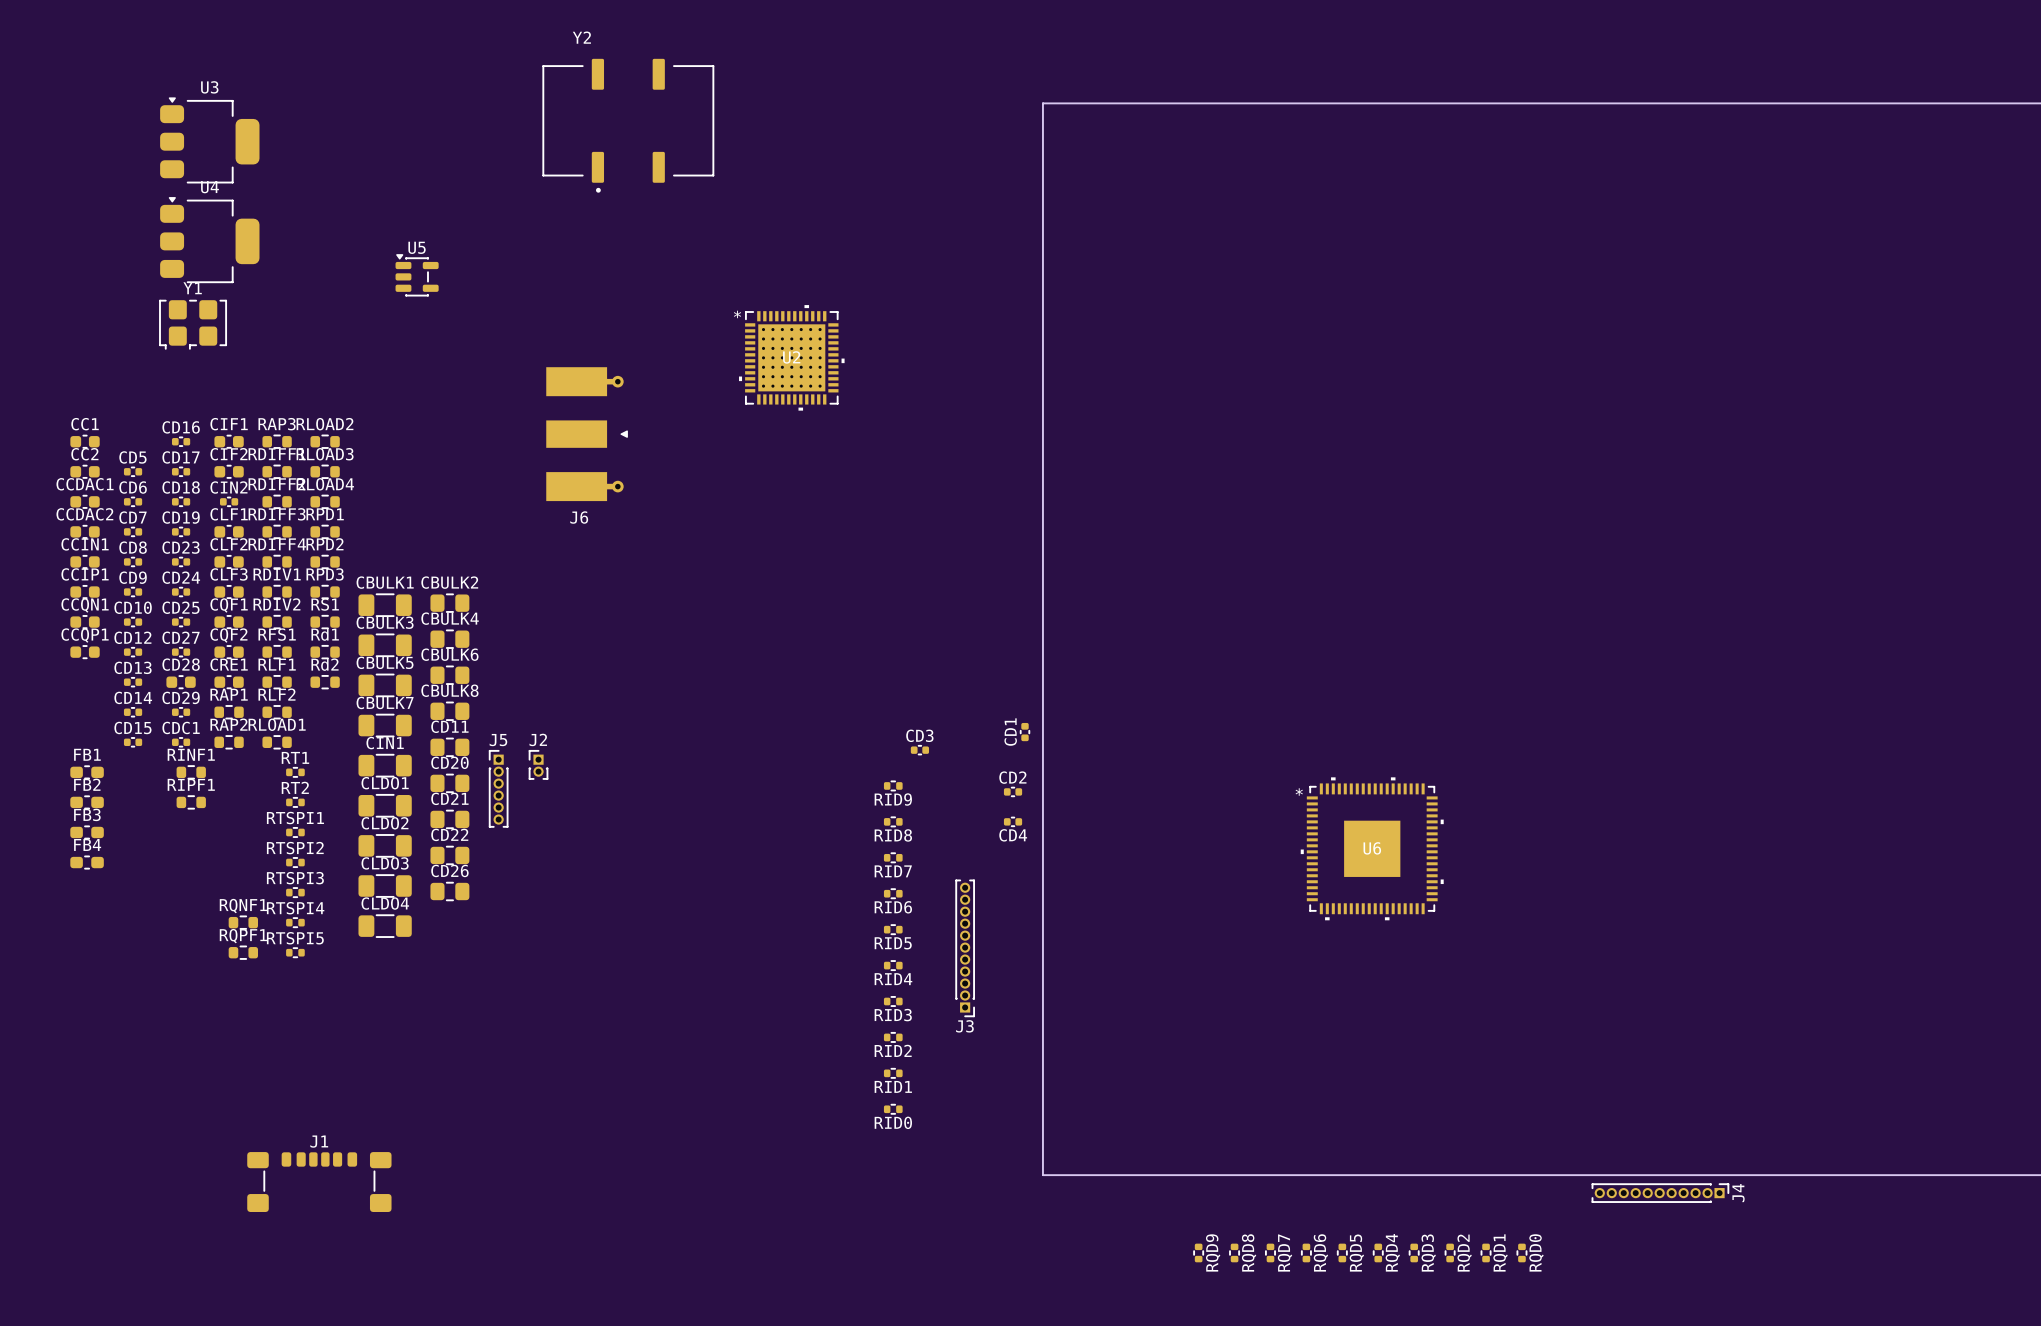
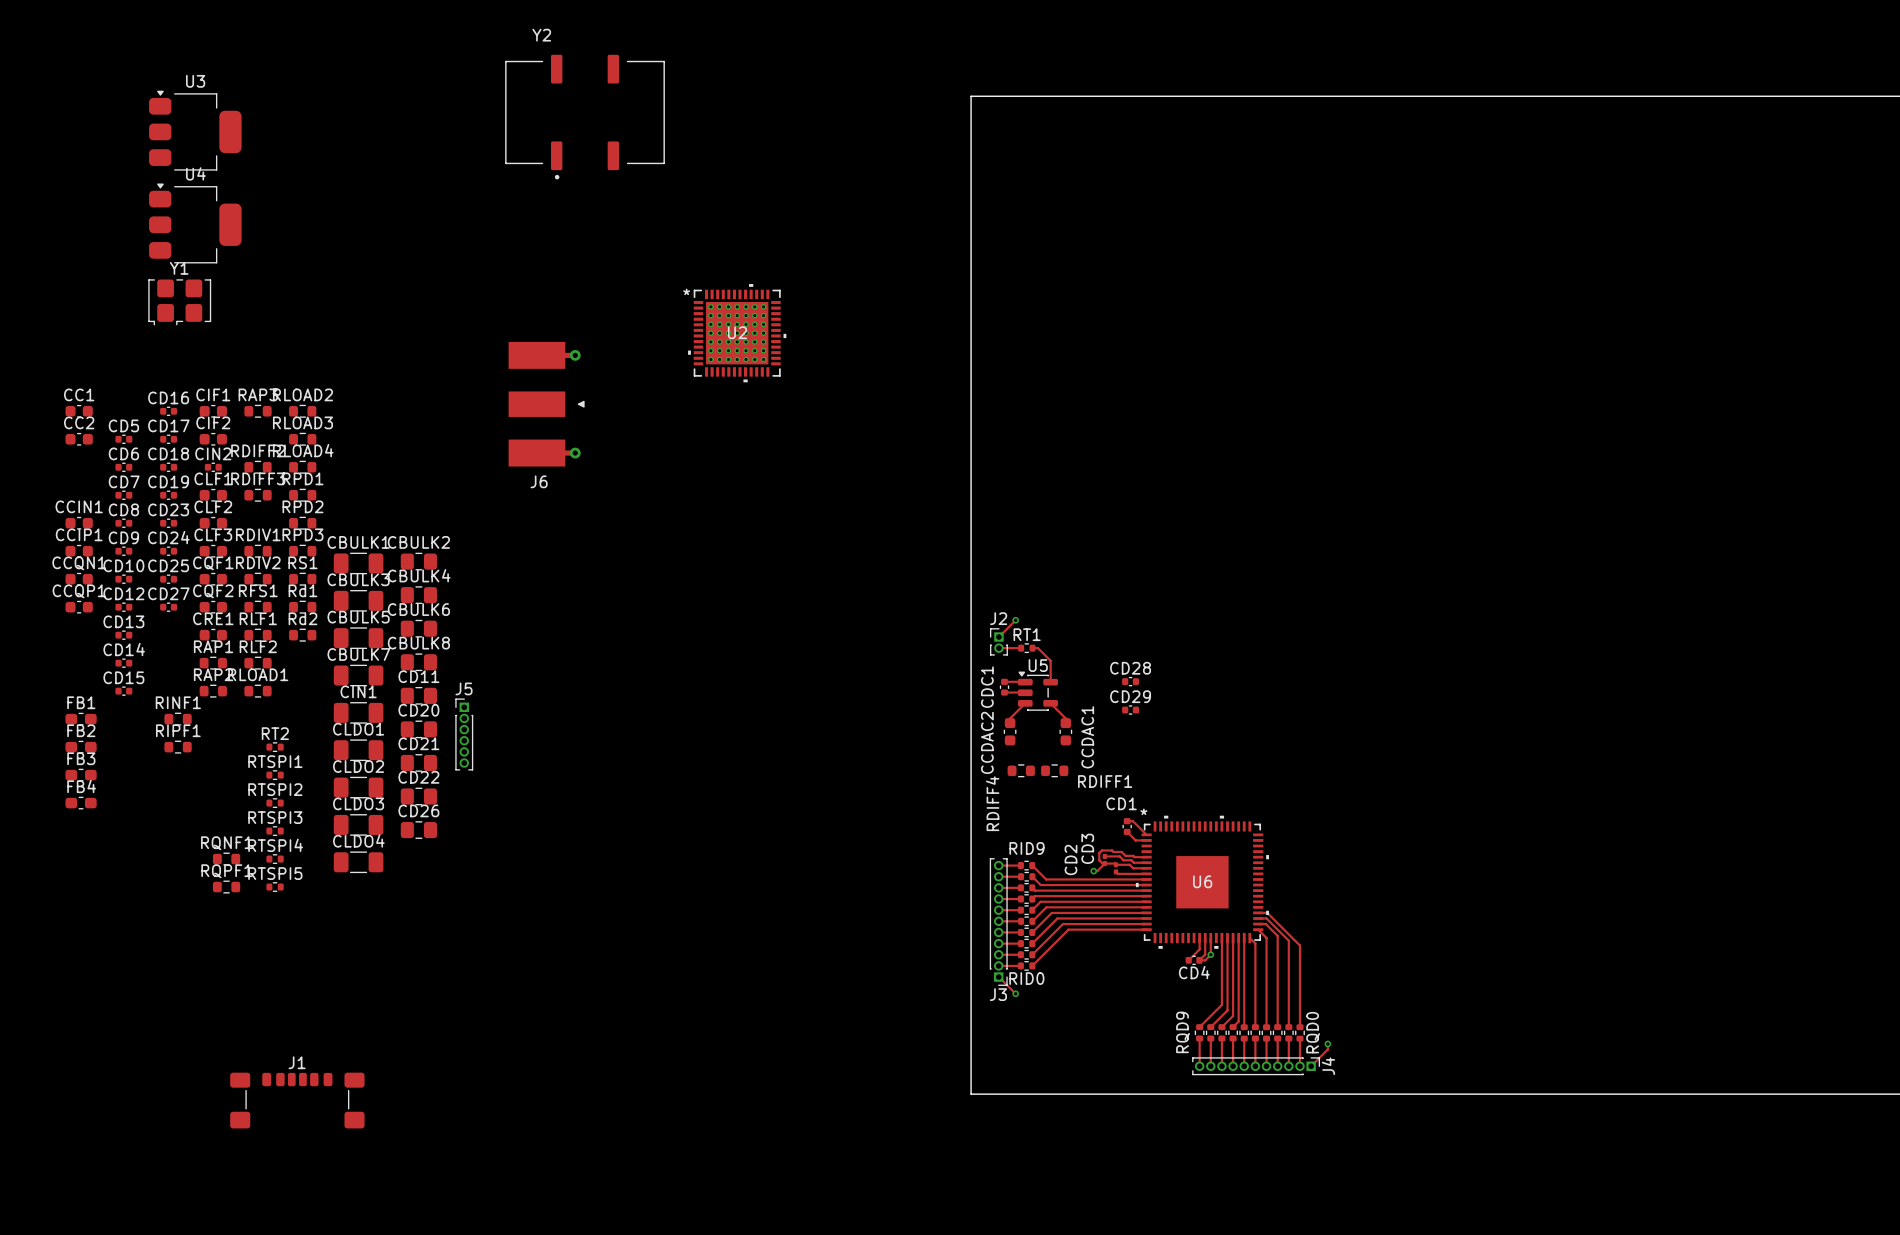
U5 position: (417, 275) -> (1037, 691)
RDIFF1 name position: RDIFF1 (277, 454) -> RDIFF1 (1105, 781)
RDIFF1 position: (277, 471) -> (1054, 770)
CCDAC1 rotation: 0° (85, 501) -> 90° clockwise (1065, 731)
CCDAC1 position: (85, 501) -> (1065, 731)
CCDAC2 name position: CCDAC2 (84, 514) -> CCDAC2 (987, 742)
CCDAC2 rotation: 0° (85, 531) -> 90° clockwise (1010, 731)
CCDAC2 position: (85, 531) -> (1010, 731)
RDIFF4 name rotation: 0° (277, 544) -> 90° counterclockwise (992, 803)
RDIFF4 position: (277, 561) -> (1021, 770)
track: none -> (1015, 620) (998, 637)
via: none -> (1015, 620)
CD28 footprint: [166, 675, 196, 690] -> [1122, 676, 1140, 687]
track: none -> (998, 648) (1021, 648)
track: none -> (1032, 648) (1037, 648) (1050, 660) (1050, 682)
CD29 position: (181, 712) -> (1130, 710)
CD1 name rotation: 0° (1010, 732) -> 90° clockwise (1121, 803)
CD1 position: (1025, 732) -> (1127, 826)
track: none -> (1004, 681) (1025, 682)
CD3 name position: CD3 (919, 735) -> CD3 (1087, 848)
CDC1 rotation: 0° (181, 742) -> 90° clockwise (1004, 687)
CDC1 position: (181, 742) -> (1004, 687)
track: none -> (1004, 692) (1025, 692)
CD3 footprint: [910, 745, 930, 756] -> [1113, 862, 1119, 875]
track: none -> (1025, 703) (1010, 718) (1010, 723)
track: none -> (1050, 703) (1065, 718) (1065, 723)
J2 position: (538, 764) -> (998, 641)
RT1 position: (295, 772) -> (1026, 648)
CD2 name position: CD2 (1012, 777) -> CD2 (1071, 859)
RID9 position: (893, 785) -> (1026, 865)
CD2 footprint: [1003, 786, 1023, 797] -> [1102, 853, 1108, 867]
U6 text position: * (1299, 792) -> * (1143, 811)
RID9 name position: RID9 (893, 799) -> RID9 (1026, 848)
RID8: (893, 821) -> none
CD4 position: (1013, 821) -> (1194, 960)
U6 position: (1372, 848) -> (1202, 882)
RID7: (893, 857) -> none
track: none -> (1127, 821) (1132, 821) (1146, 834)
RID6: (893, 893) -> none
track: none -> (1127, 831) (1135, 840) (1146, 840)
track: none -> (1104, 856) (1119, 856) (1123, 860) (1131, 860) (1133, 862) (1146, 862)
track: none -> (1146, 857) (1125, 855) (1121, 851) (1112, 850) (1101, 850) (1099, 853) (1099, 860) (1102, 863) (1129, 864) (1133, 868) (1146, 868)
track: none -> (1104, 863) (1097, 871) (1093, 871)
RID5: (893, 929) -> none
track: none -> (998, 865) (1020, 865)
track: none -> (1032, 865) (1046, 879) (1146, 879)
via: none -> (1093, 871)
track: none -> (1116, 871) (1117, 873) (1146, 873)
track: none -> (998, 876) (1021, 876)
part: none -> (1026, 876)
track: none -> (1032, 876) (1040, 885) (1146, 885)
J3 position: (965, 948) -> (998, 922)
track: none -> (998, 887) (1020, 887)
part: none -> (1026, 887)
track: none -> (1032, 887) (1035, 890) (1146, 890)
track: none -> (1146, 896) (1035, 896) (1032, 899)
RID4: (893, 965) -> none
track: none -> (998, 899) (1020, 899)
part: none -> (1026, 899)
track: none -> (1146, 901) (1040, 901) (1032, 910)
track: none -> (1146, 907) (1046, 907) (1032, 921)
track: none -> (998, 910) (1020, 910)
part: none -> (1026, 910)
track: none -> (1146, 912) (1051, 912) (1032, 932)
track: none -> (1258, 912) (1267, 912) (1299, 945) (1299, 1027)
track: none -> (1146, 918) (1057, 918) (1032, 943)
track: none -> (1258, 918) (1266, 918) (1288, 940) (1288, 1027)
track: none -> (998, 921) (1021, 921)
part: none -> (1026, 921)
track: none -> (1146, 924) (1062, 924) (1032, 954)
track: none -> (1258, 924) (1265, 924) (1277, 935) (1277, 1027)
track: none -> (1146, 929) (1068, 929) (1032, 965)
track: none -> (1258, 929) (1266, 937) (1266, 1027)
RID3: (893, 1001) -> none
track: none -> (998, 932) (1020, 932)
part: none -> (1026, 932)
track: none -> (1199, 938) (1199, 949) (1188, 960)
track: none -> (1205, 938) (1205, 954) (1199, 960) (1205, 960) (1210, 954) (1210, 938)
track: none -> (1221, 938) (1221, 1004) (1199, 1027)
track: none -> (1227, 938) (1227, 1010) (1210, 1027)
track: none -> (1233, 938) (1233, 1015) (1221, 1027)
track: none -> (1238, 938) (1238, 1021) (1233, 1027)
track: none -> (1244, 938) (1244, 1027)
track: none -> (1249, 938) (1255, 943) (1255, 1027)
track: none -> (998, 943) (1020, 943)
part: none -> (1026, 943)
track: none -> (998, 954) (1020, 954)
part: none -> (1026, 954)
via: none -> (1210, 954)
RID2: (893, 1037) -> none
track: none -> (998, 965) (1020, 965)
track: none -> (998, 977) (1015, 993)
via: none -> (1015, 993)
RID1: (893, 1073) -> none
RID0 position: (893, 1109) -> (1026, 965)
part: none -> (1210, 1032)
part: none -> (1221, 1032)
part: none -> (1233, 1032)
part: none -> (1244, 1032)
part: none -> (1255, 1032)
part: none -> (1266, 1032)
part: none -> (1277, 1032)
part: none -> (1288, 1032)
track: none -> (1199, 1038) (1199, 1066)
track: none -> (1210, 1038) (1210, 1066)
track: none -> (1221, 1038) (1221, 1066)
track: none -> (1233, 1038) (1233, 1066)
track: none -> (1244, 1038) (1244, 1066)
track: none -> (1255, 1038) (1255, 1066)
track: none -> (1266, 1038) (1266, 1066)
track: none -> (1277, 1038) (1277, 1066)
track: none -> (1288, 1038) (1288, 1066)
track: none -> (1299, 1038) (1299, 1066)
track: none -> (1327, 1043) (1327, 1049) (1311, 1066)
via: none -> (1327, 1043)
J4 position: (1660, 1193) -> (1256, 1066)
RQD9 position: (1198, 1252) -> (1199, 1032)
RQD9 name position: RQD9 (1213, 1252) -> RQD9 (1183, 1032)
RQD8: (1234, 1252) -> none
RQD7: (1270, 1252) -> none
RQD6: (1306, 1252) -> none
RQD5: (1342, 1252) -> none
RQD4: (1378, 1252) -> none
RQD3: (1414, 1252) -> none
RQD2: (1450, 1252) -> none
RQD1: (1486, 1252) -> none
RQD0 position: (1521, 1252) -> (1299, 1032)

